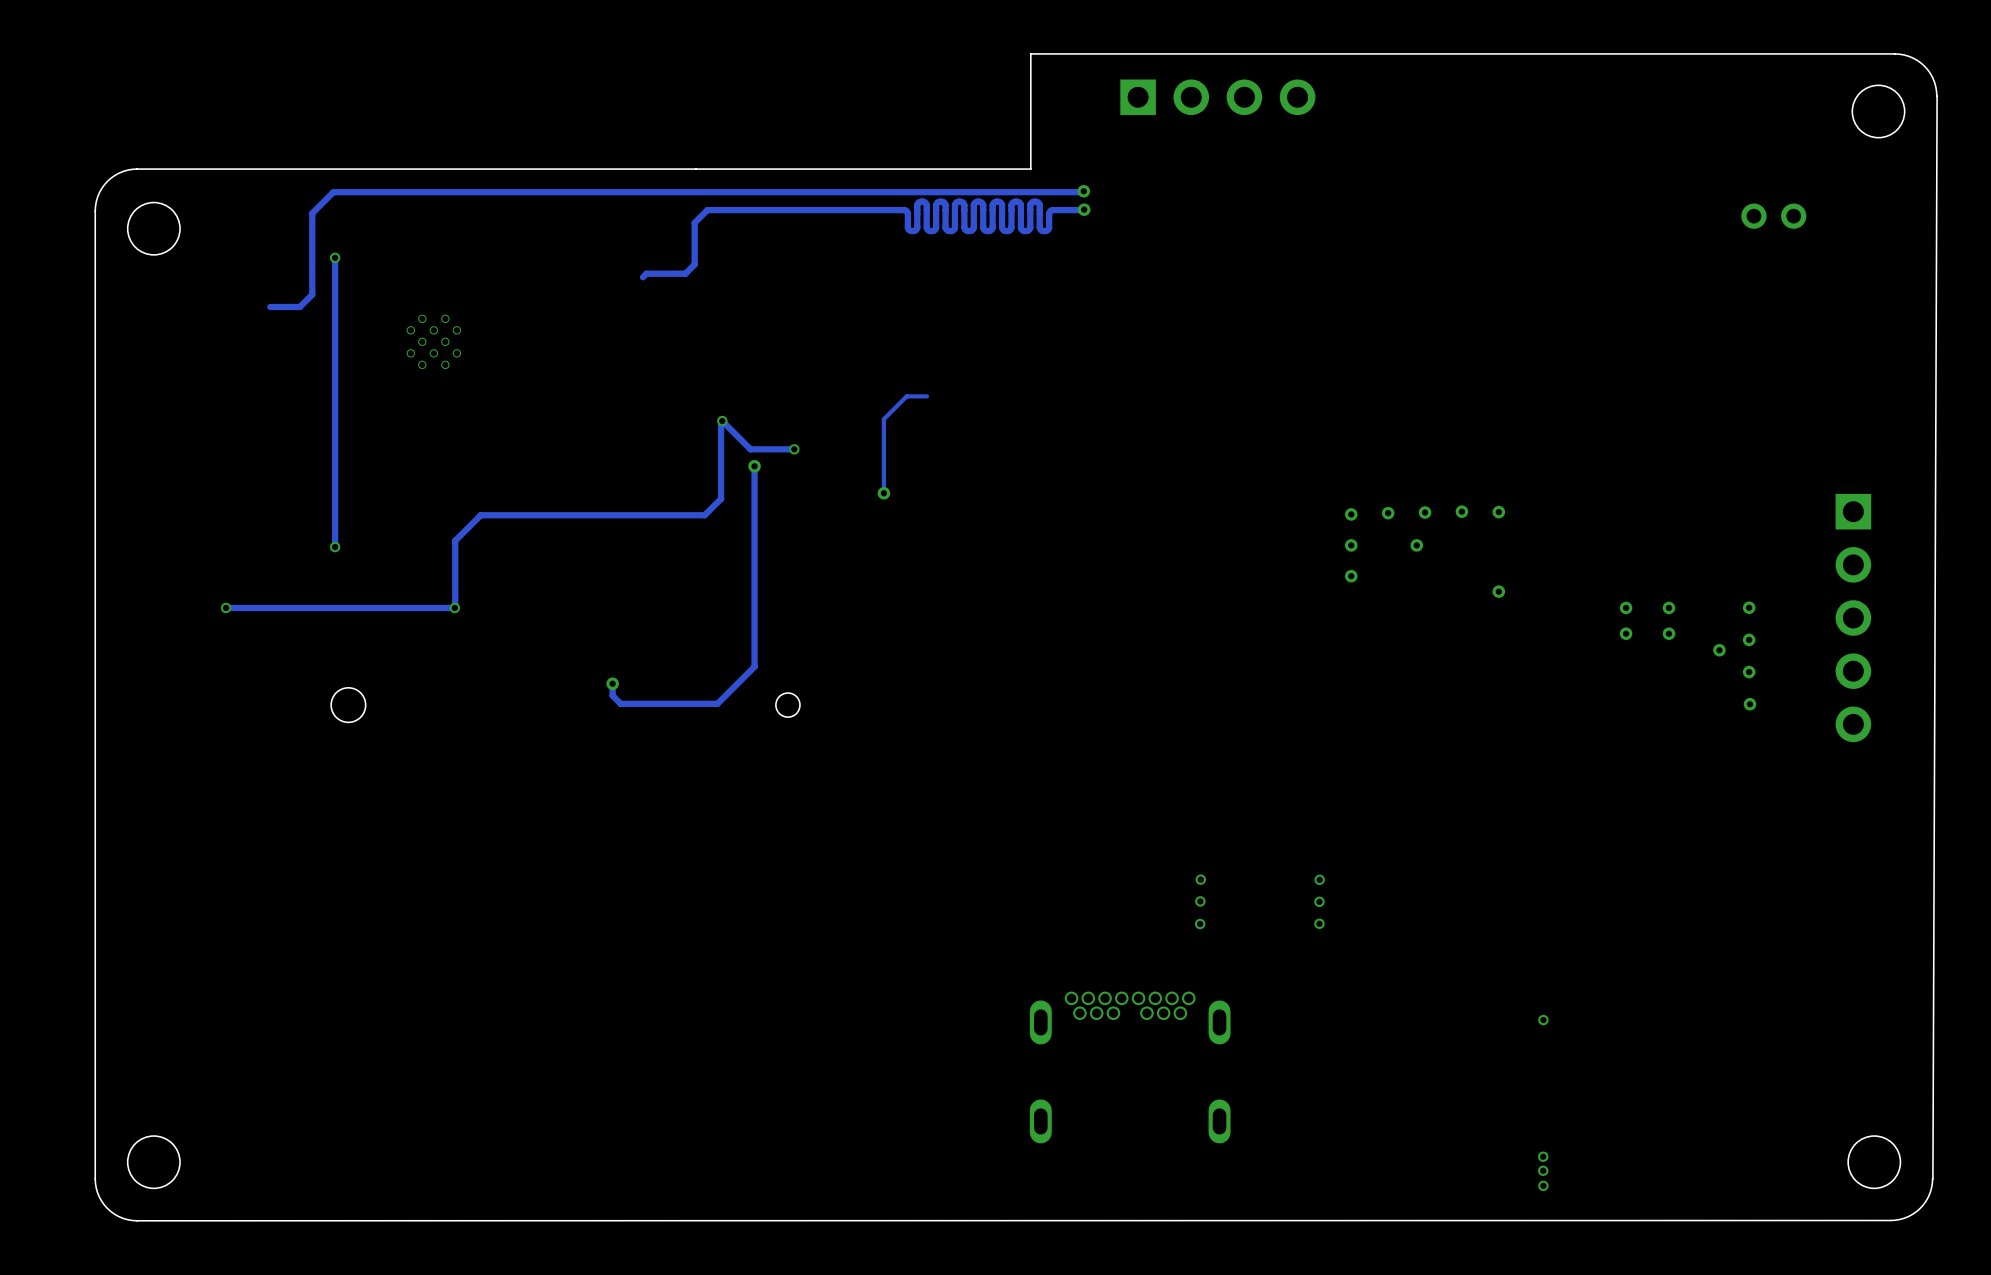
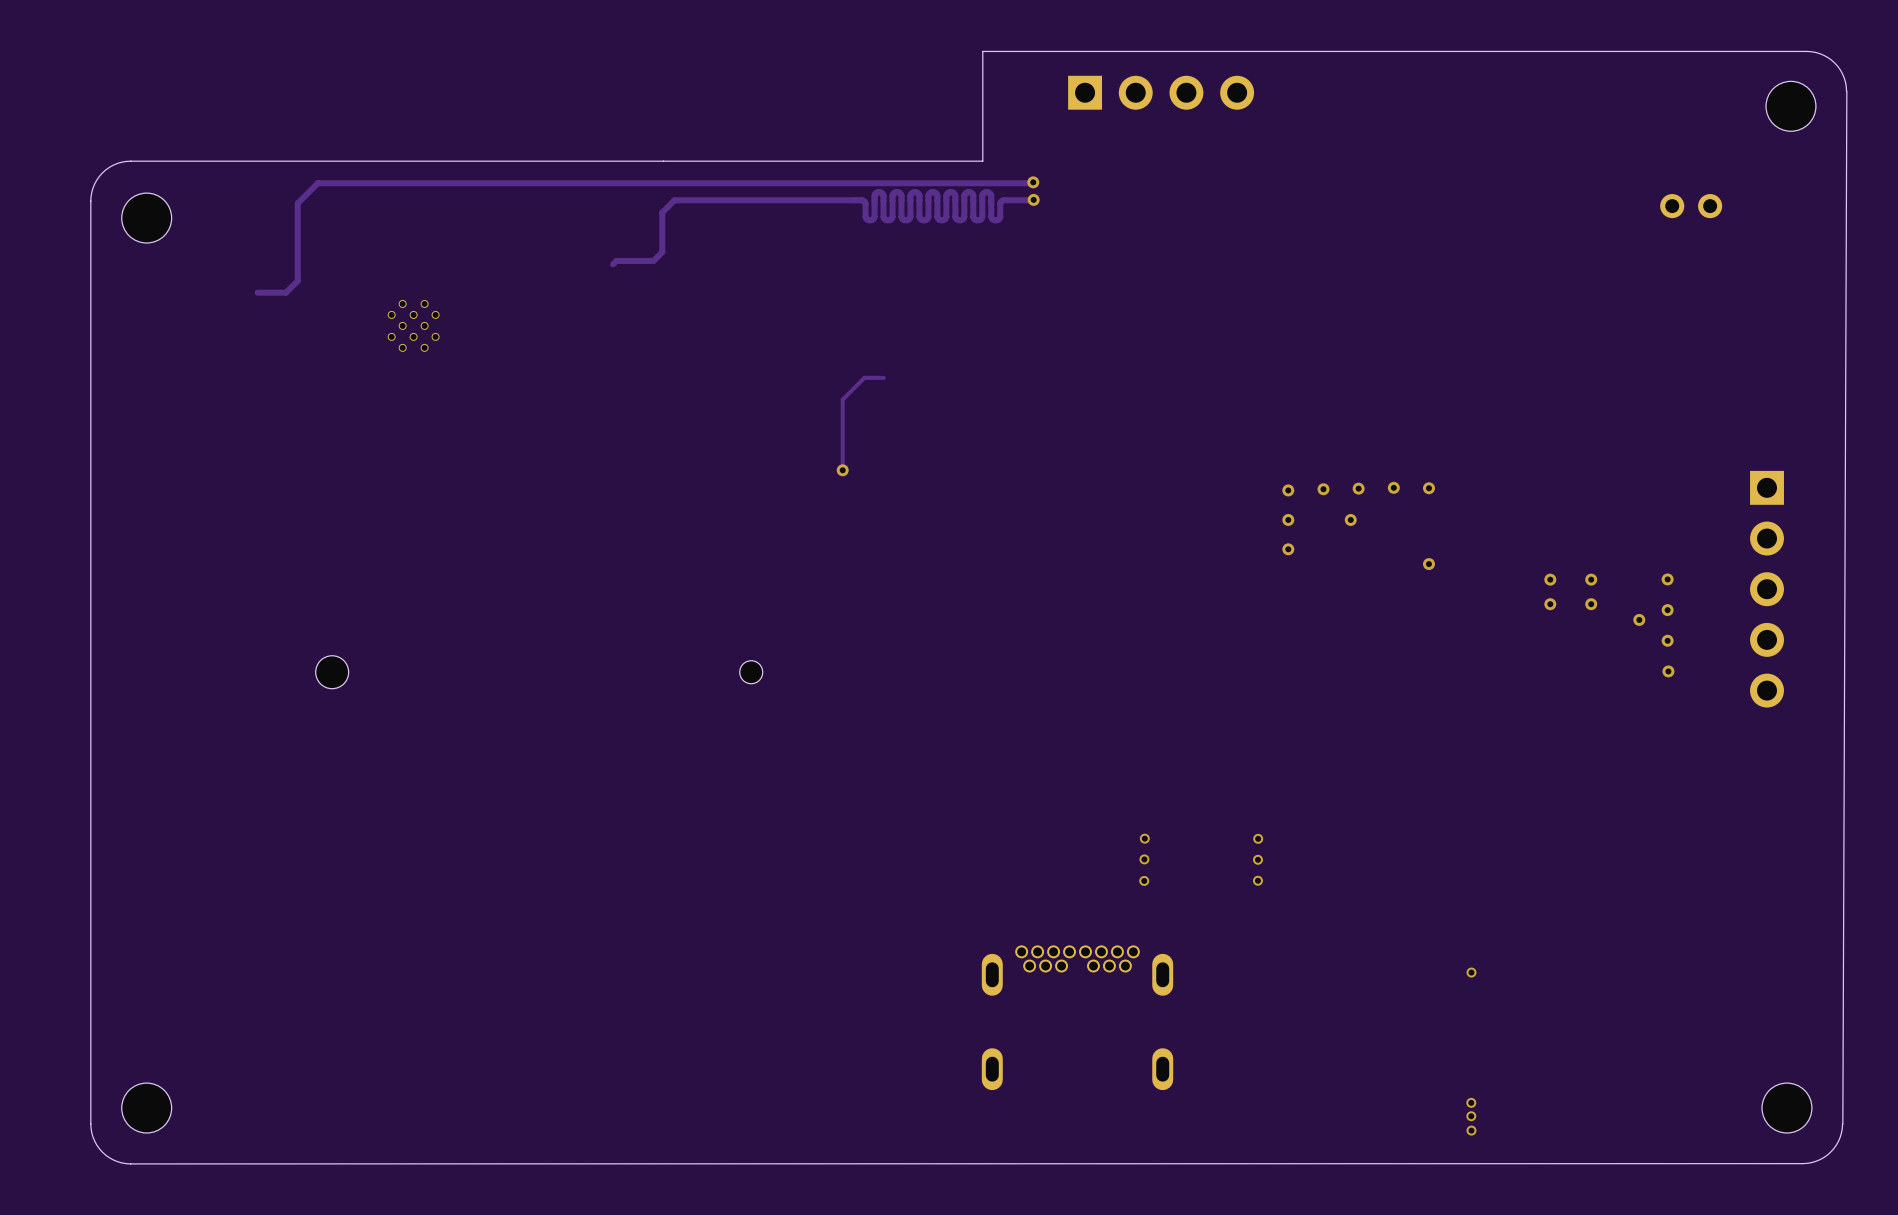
track: (335, 257) (335, 547) -> none
via: (335, 257) -> none
via: (722, 421) -> none
track: (794, 449) (750, 449) (722, 421) (721, 498) (704, 515) (480, 515) (455, 540) (454, 607) (226, 607) -> none
via: (794, 449) -> none
track: (754, 466) (754, 666) (717, 703) (620, 703) (612, 695) (612, 683) -> none
via: (754, 466) -> none
via: (335, 547) -> none
via: (226, 607) -> none
via: (454, 607) -> none
via: (612, 683) -> none

